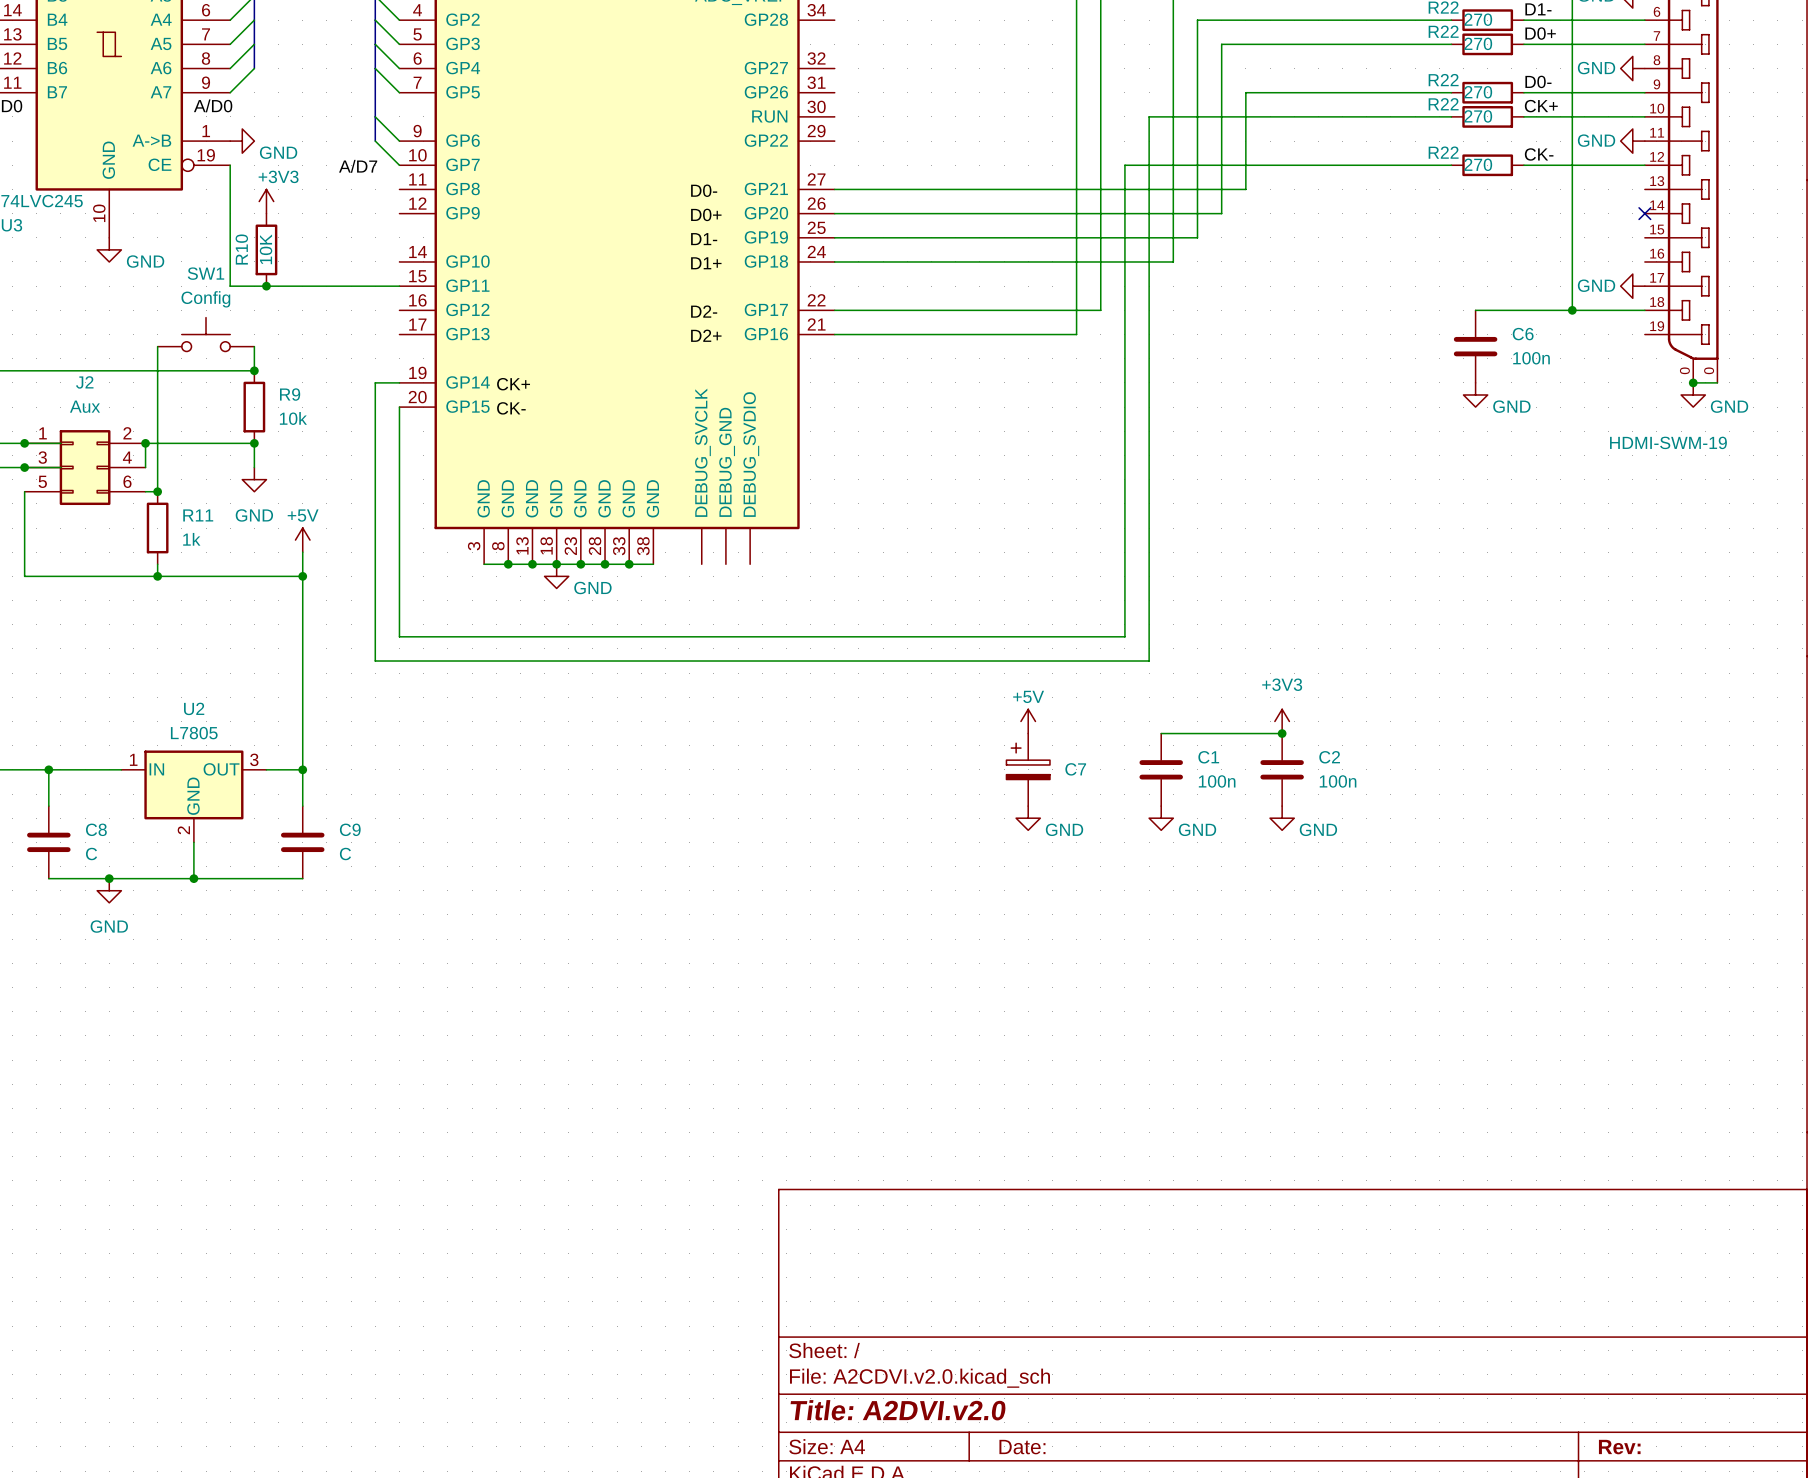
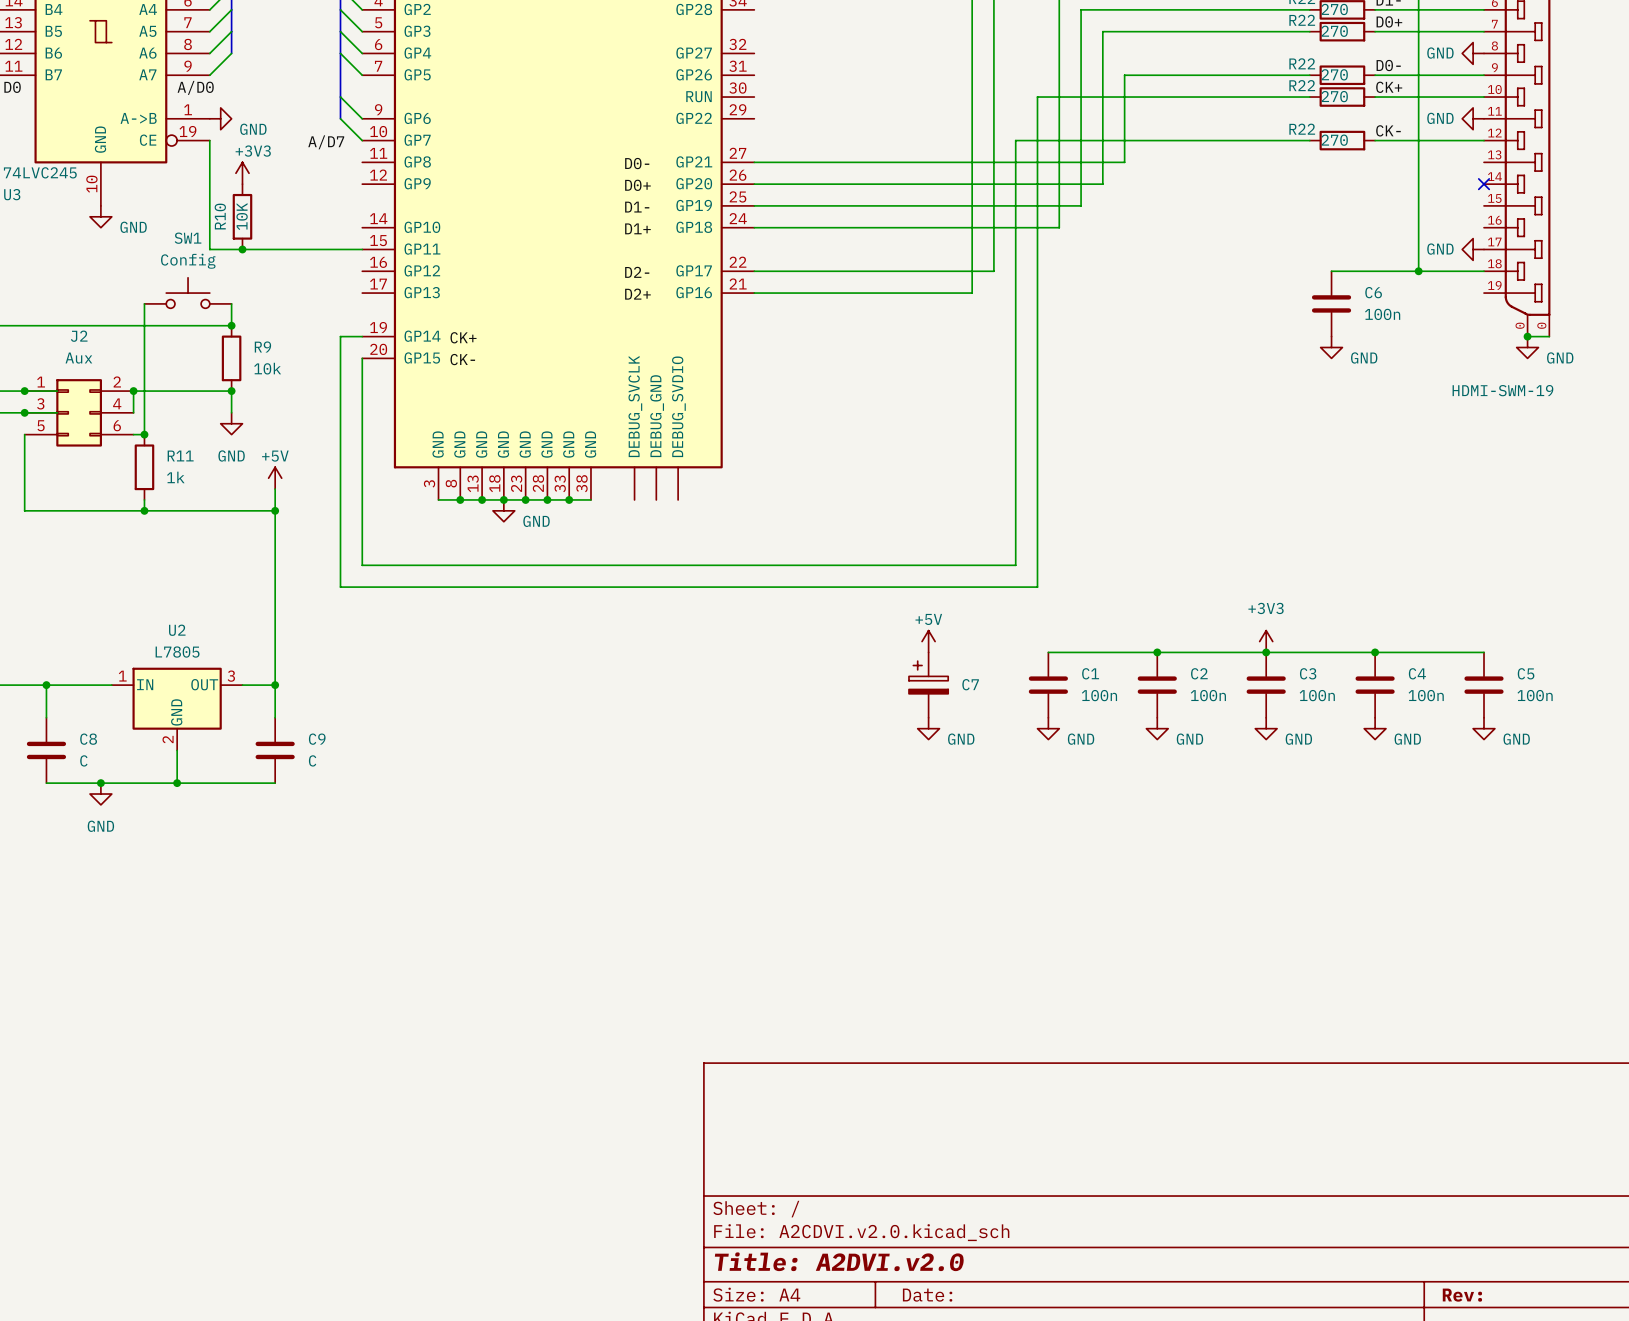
power symbol position: +3V3 (1282, 721) -> +3V3 (1266, 641)
wire: none -> (1157, 652) (1484, 652)
junction: none -> (1266, 652)
junction: none -> (1375, 652)
C3: none -> 100n (1266, 685)
C4: none -> 100n (1375, 685)
C5: none -> 100n (1484, 685)
power symbol: none -> GND (1266, 728)
power symbol: none -> GND (1375, 728)
power symbol: none -> GND (1484, 728)

